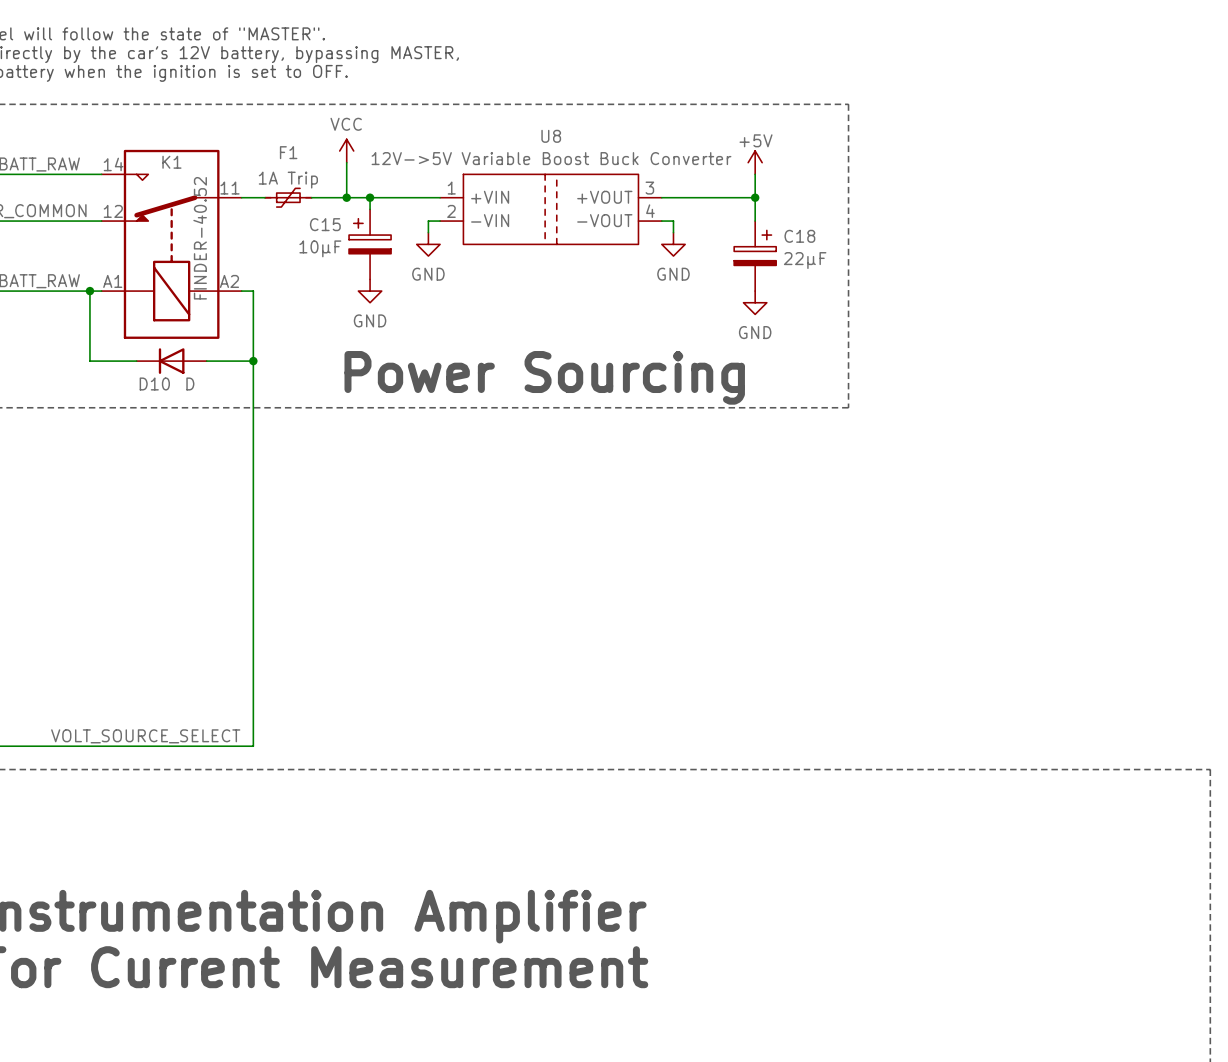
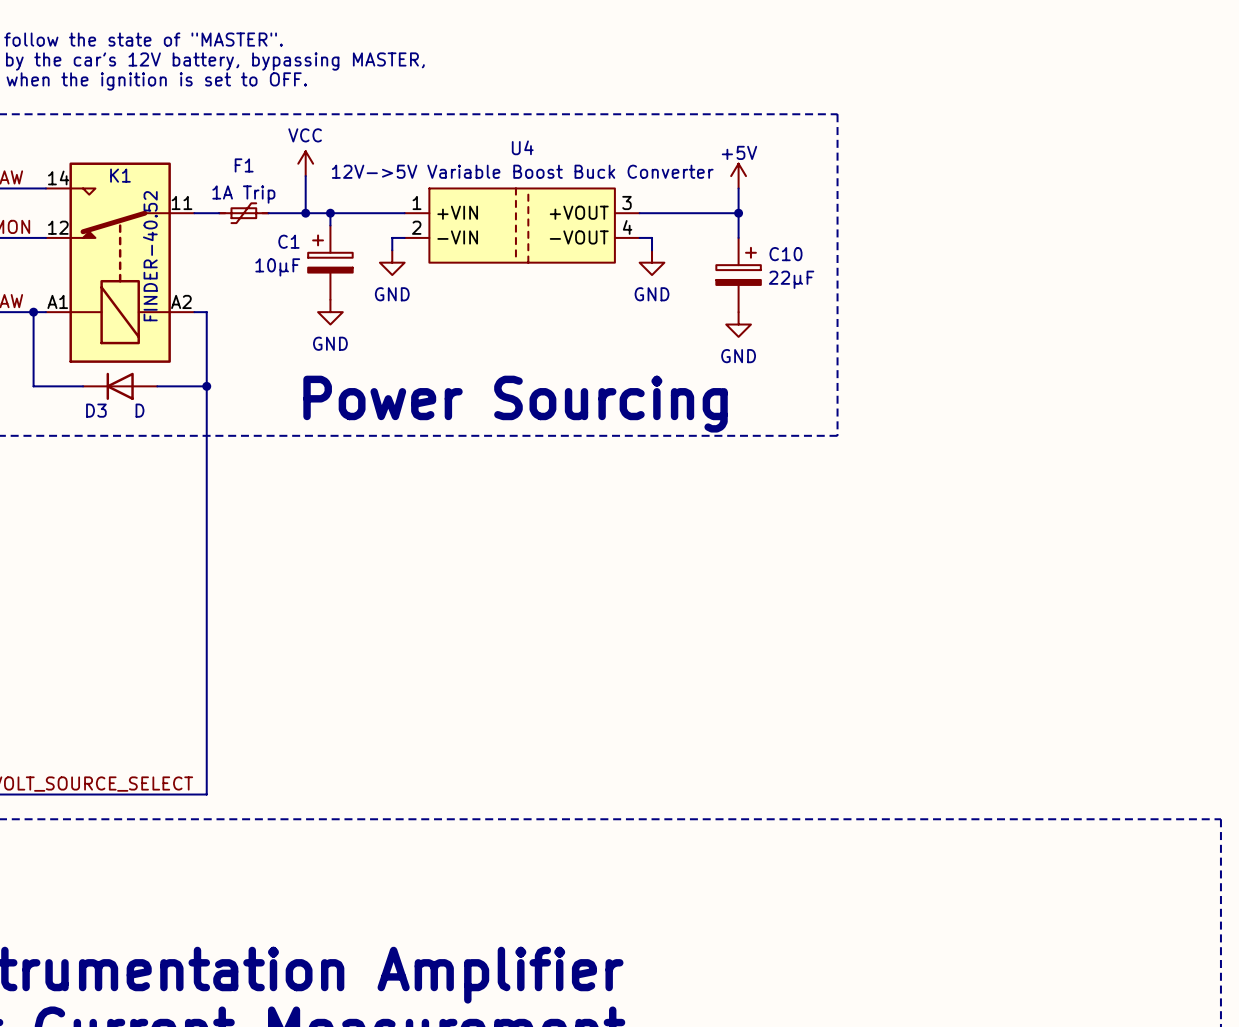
U8 name: U8 (551, 136) -> U4 (522, 147)
C15 name: C15 (325, 224) -> C1 (288, 241)
C18 name: C18 (799, 236) -> C10 (785, 254)
D10 name: D10 (154, 383) -> D3 (96, 410)

